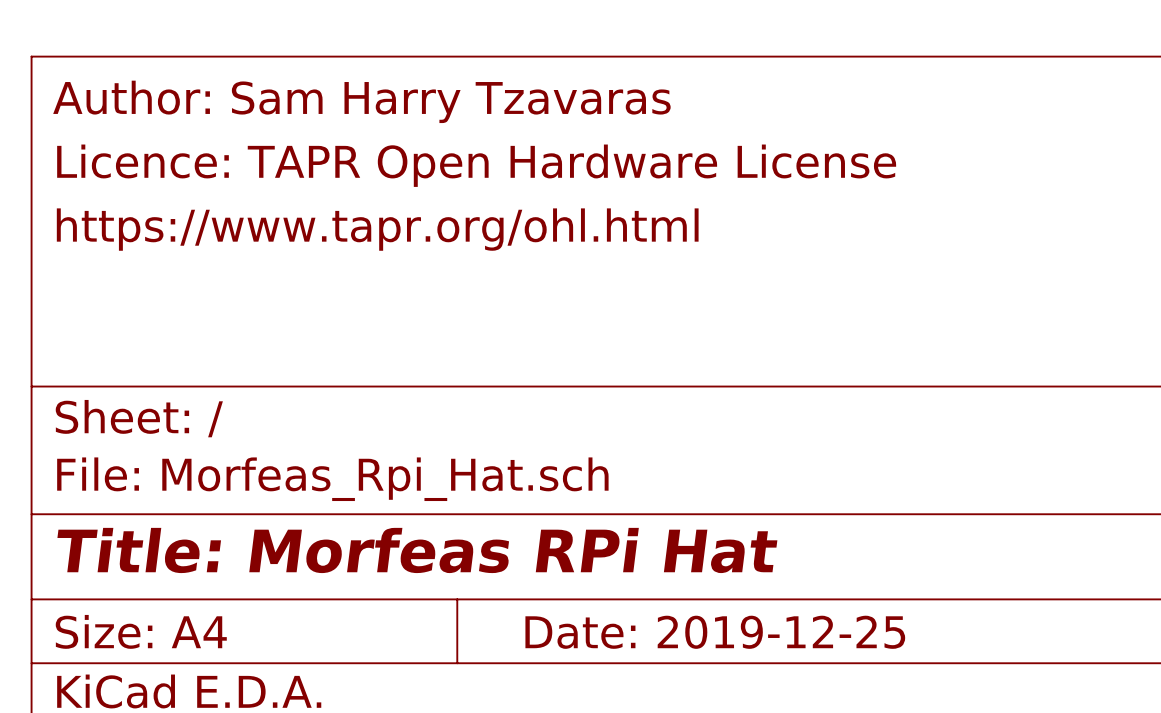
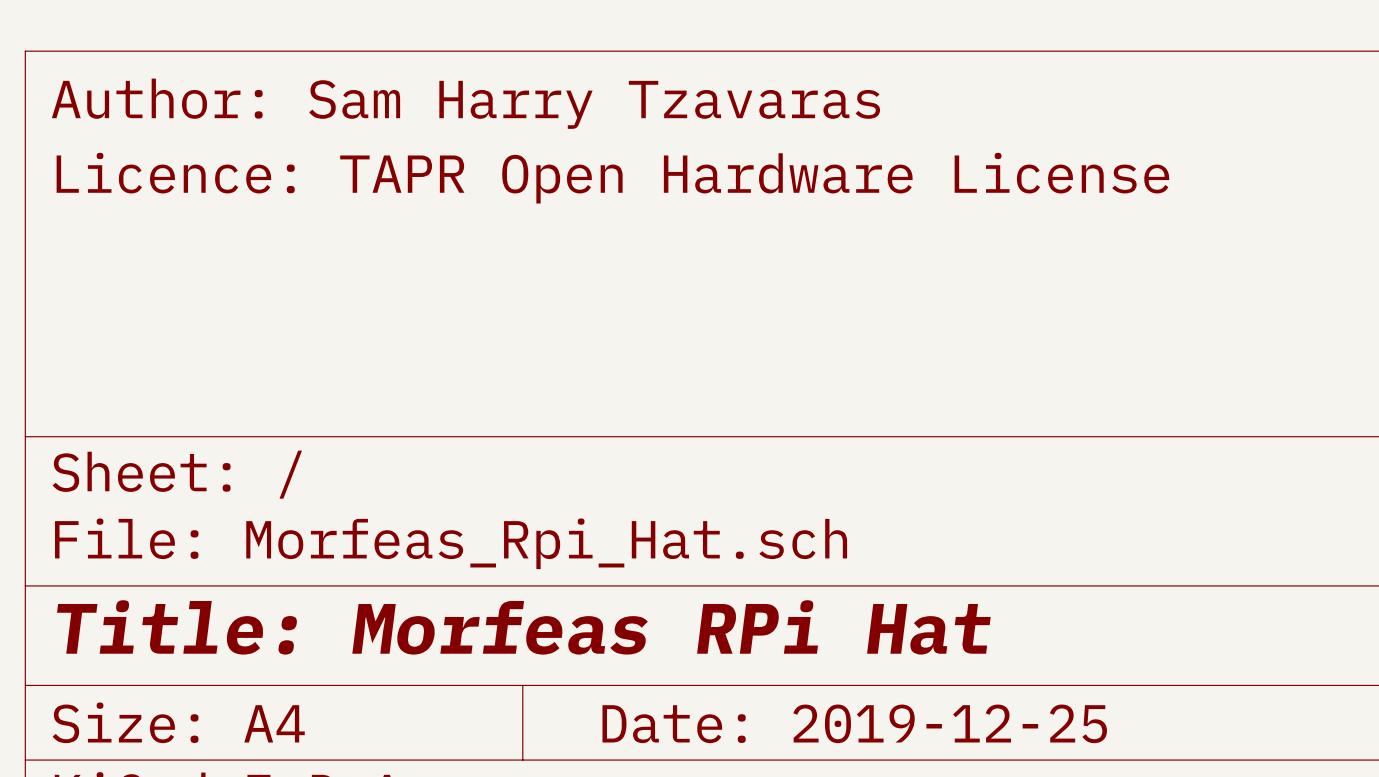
title block: https://www.tapr.org/ohl.html (377, 229) -> none

